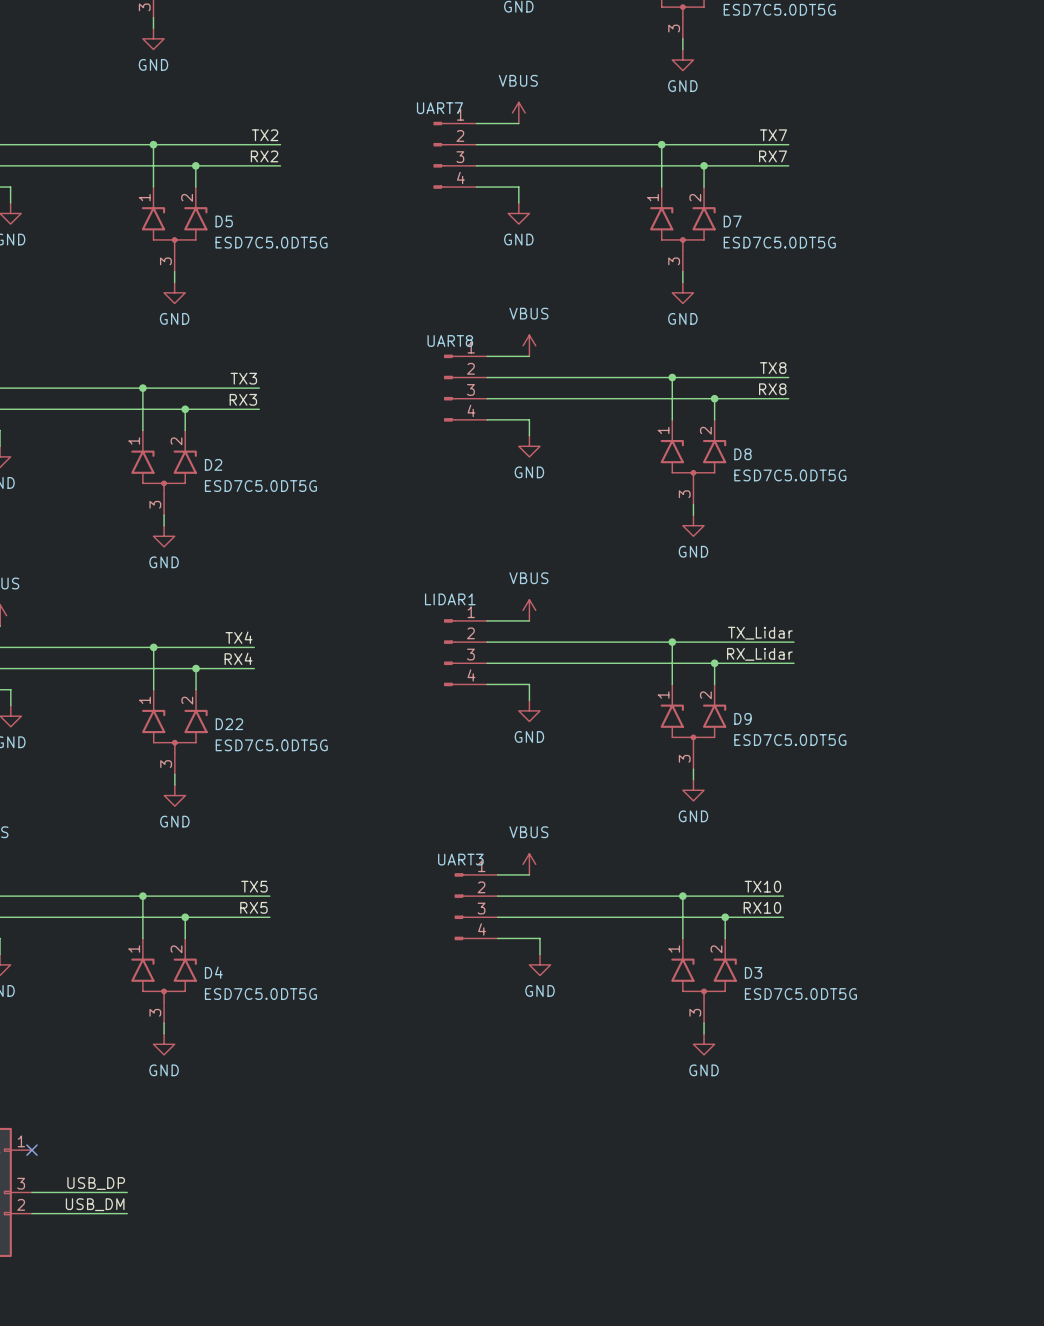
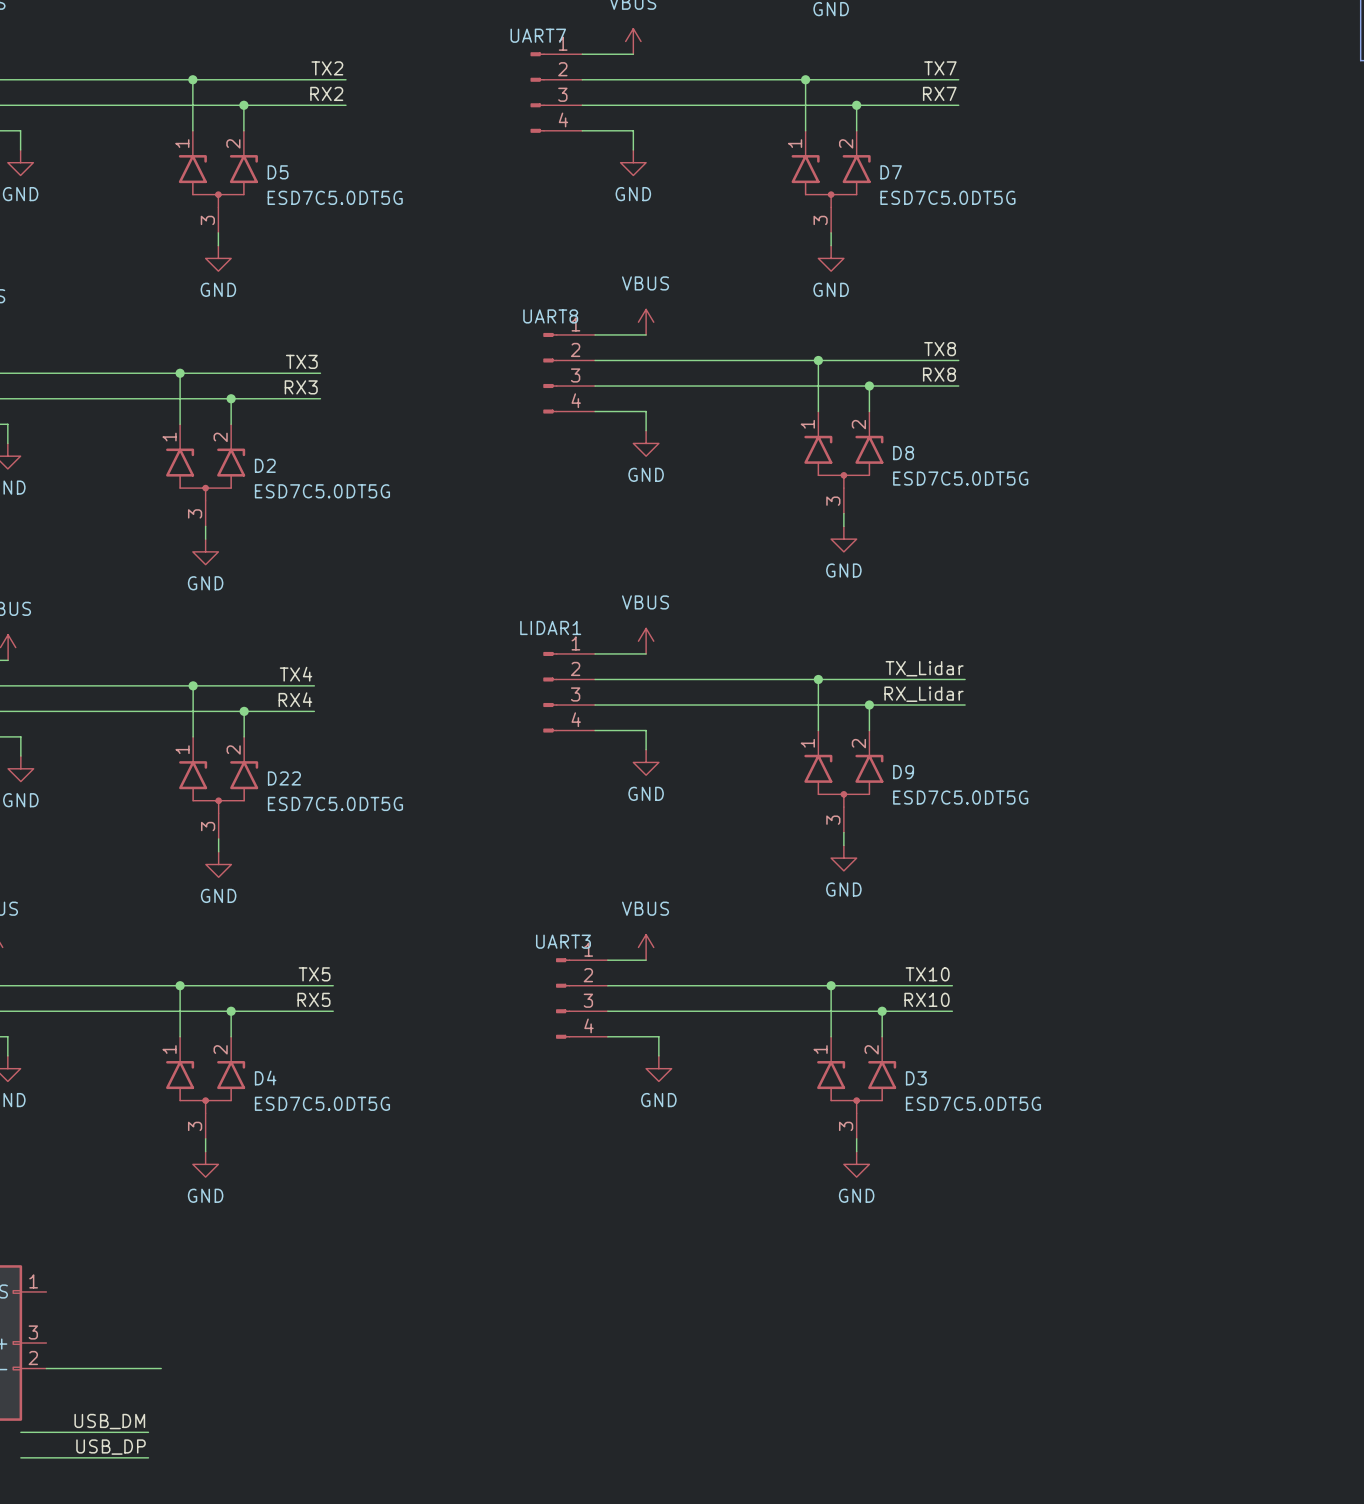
no-connect mark: (31, 1150) -> none
label position: USB_DP (96, 1183) -> USB_DP (111, 1447)
wire: (31, 1192) (127, 1192) -> none
label position: USB_DM (95, 1204) -> USB_DM (109, 1421)
wire: none -> (20, 1432) (148, 1432)
wire: none -> (20, 1457) (148, 1457)

